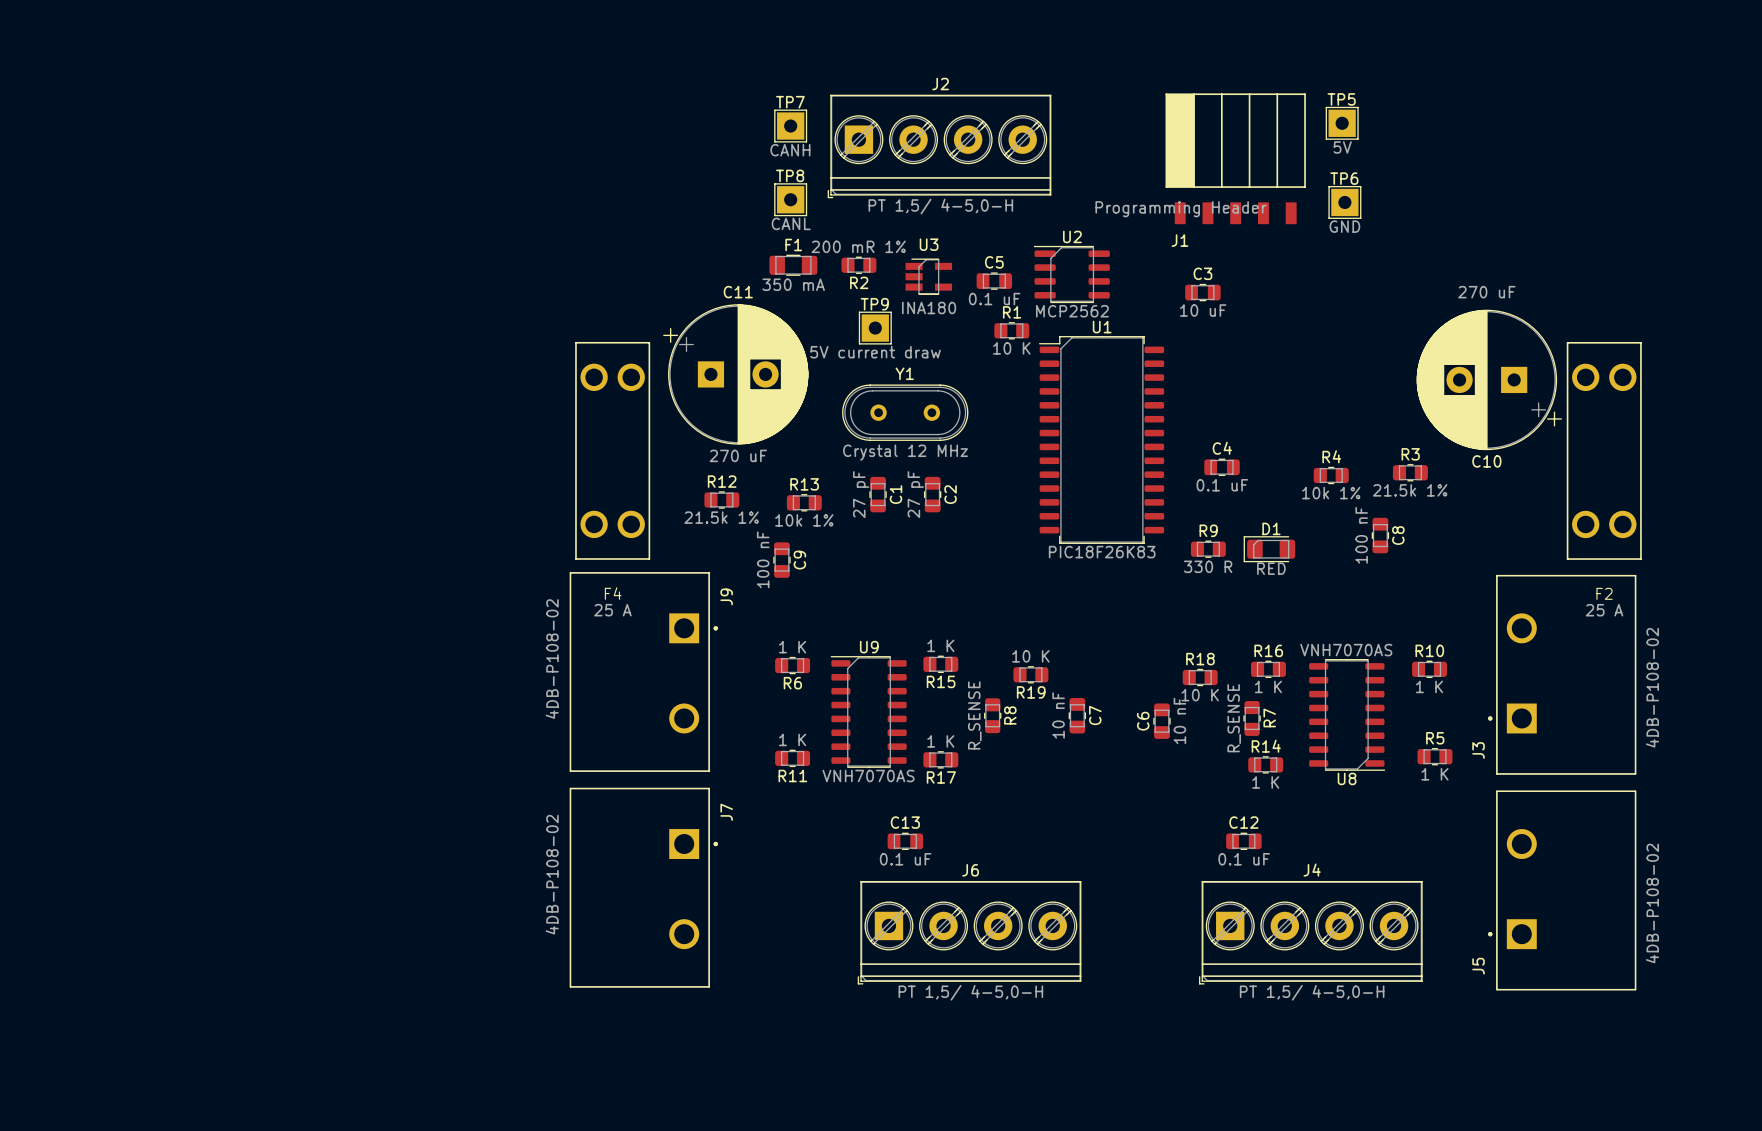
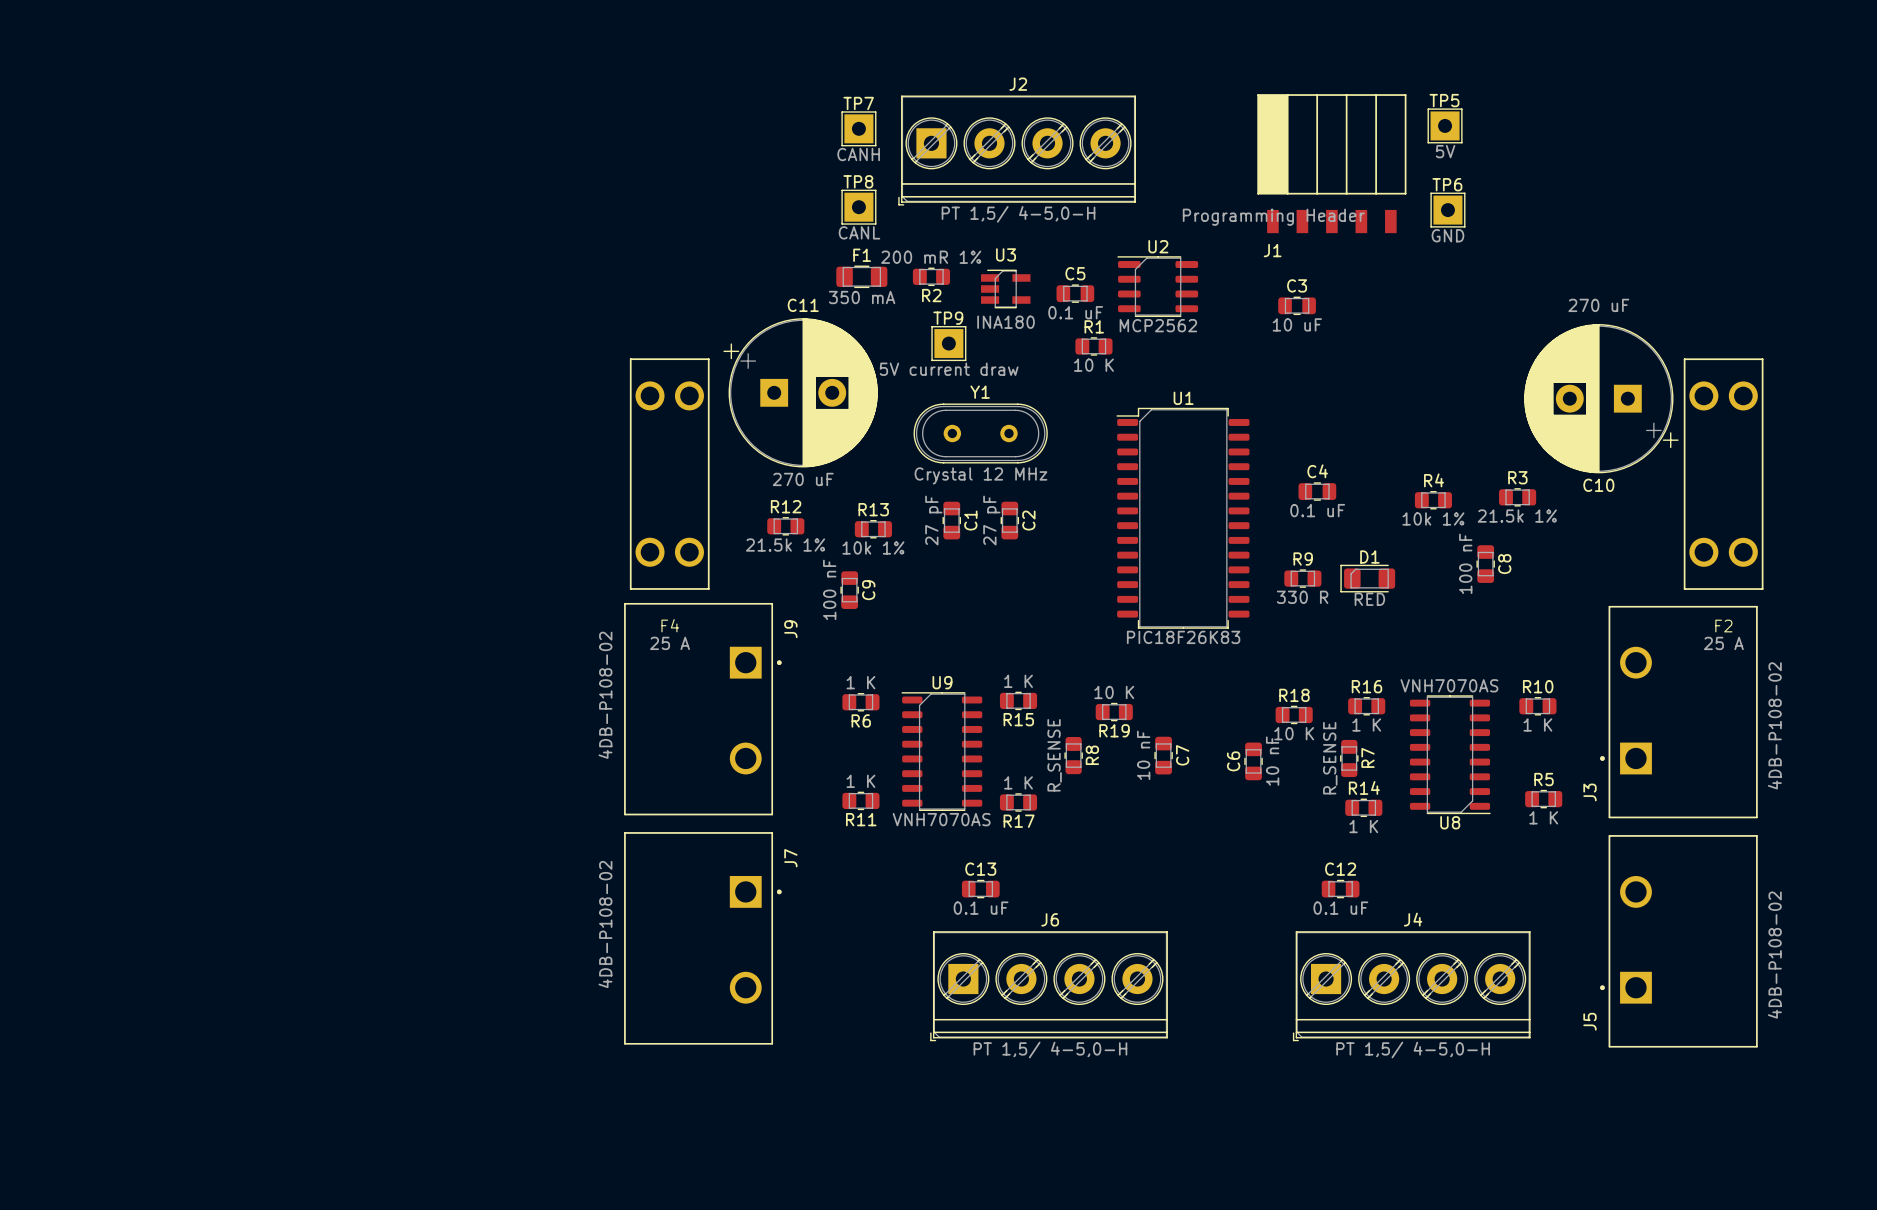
U1 position: (1101, 440) -> (1182, 518)

